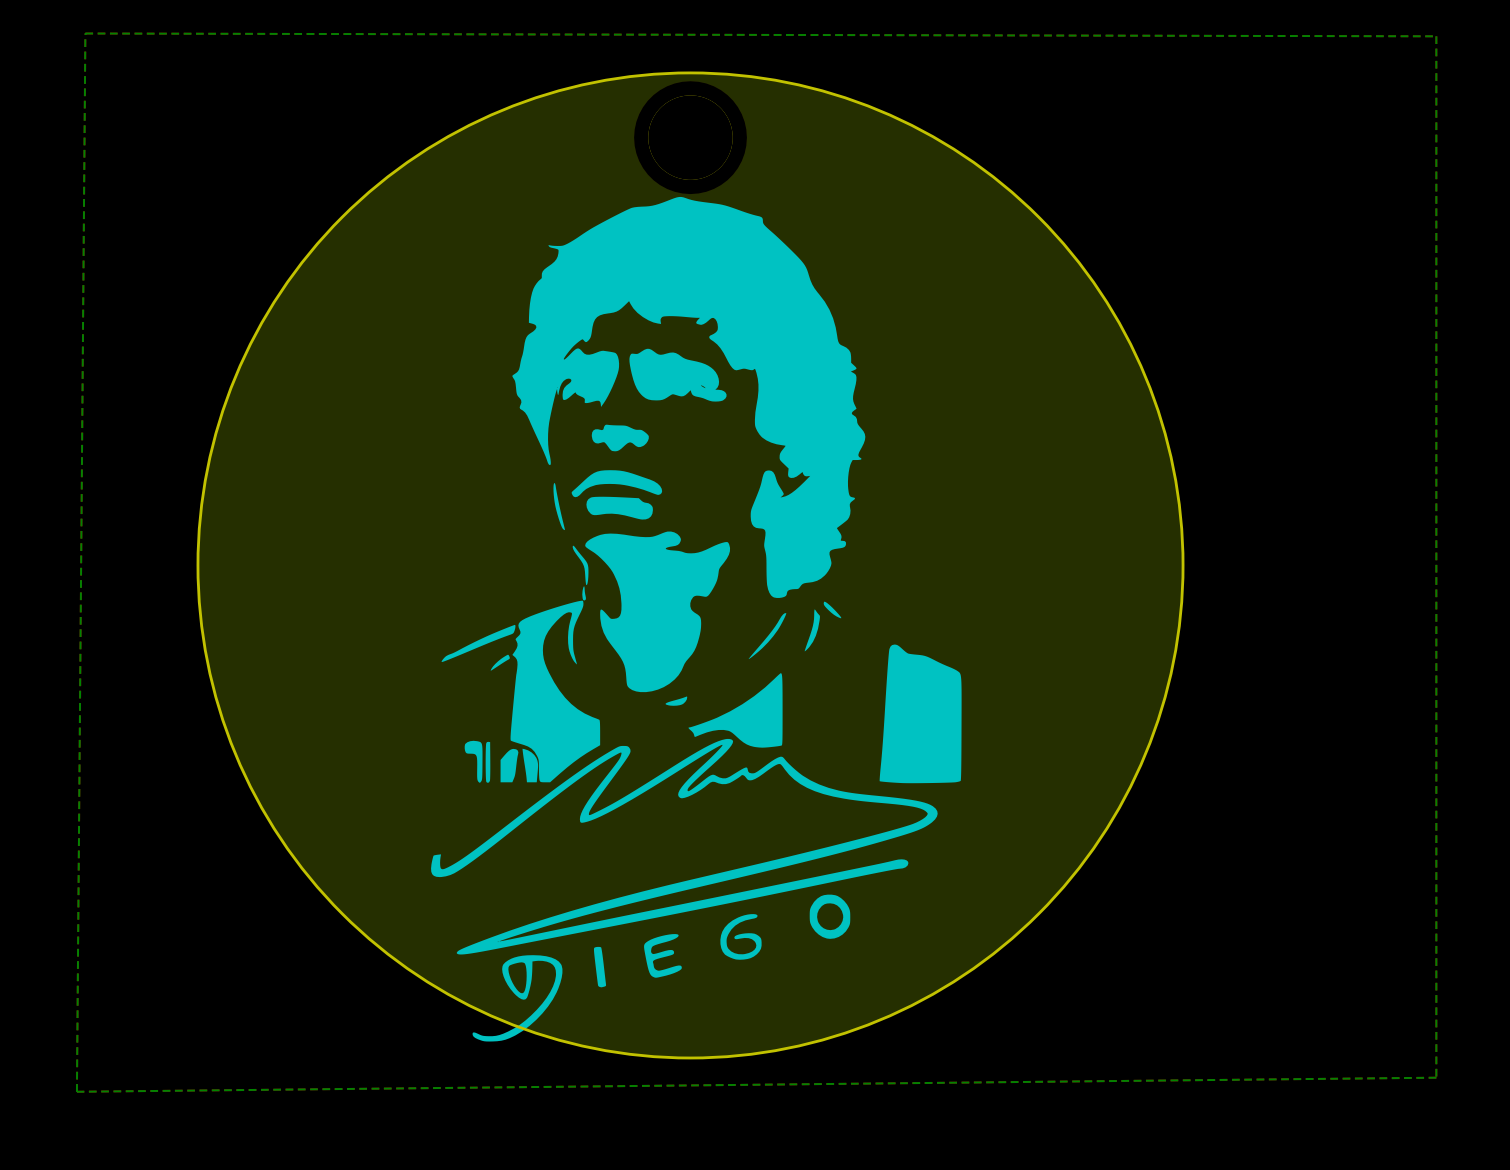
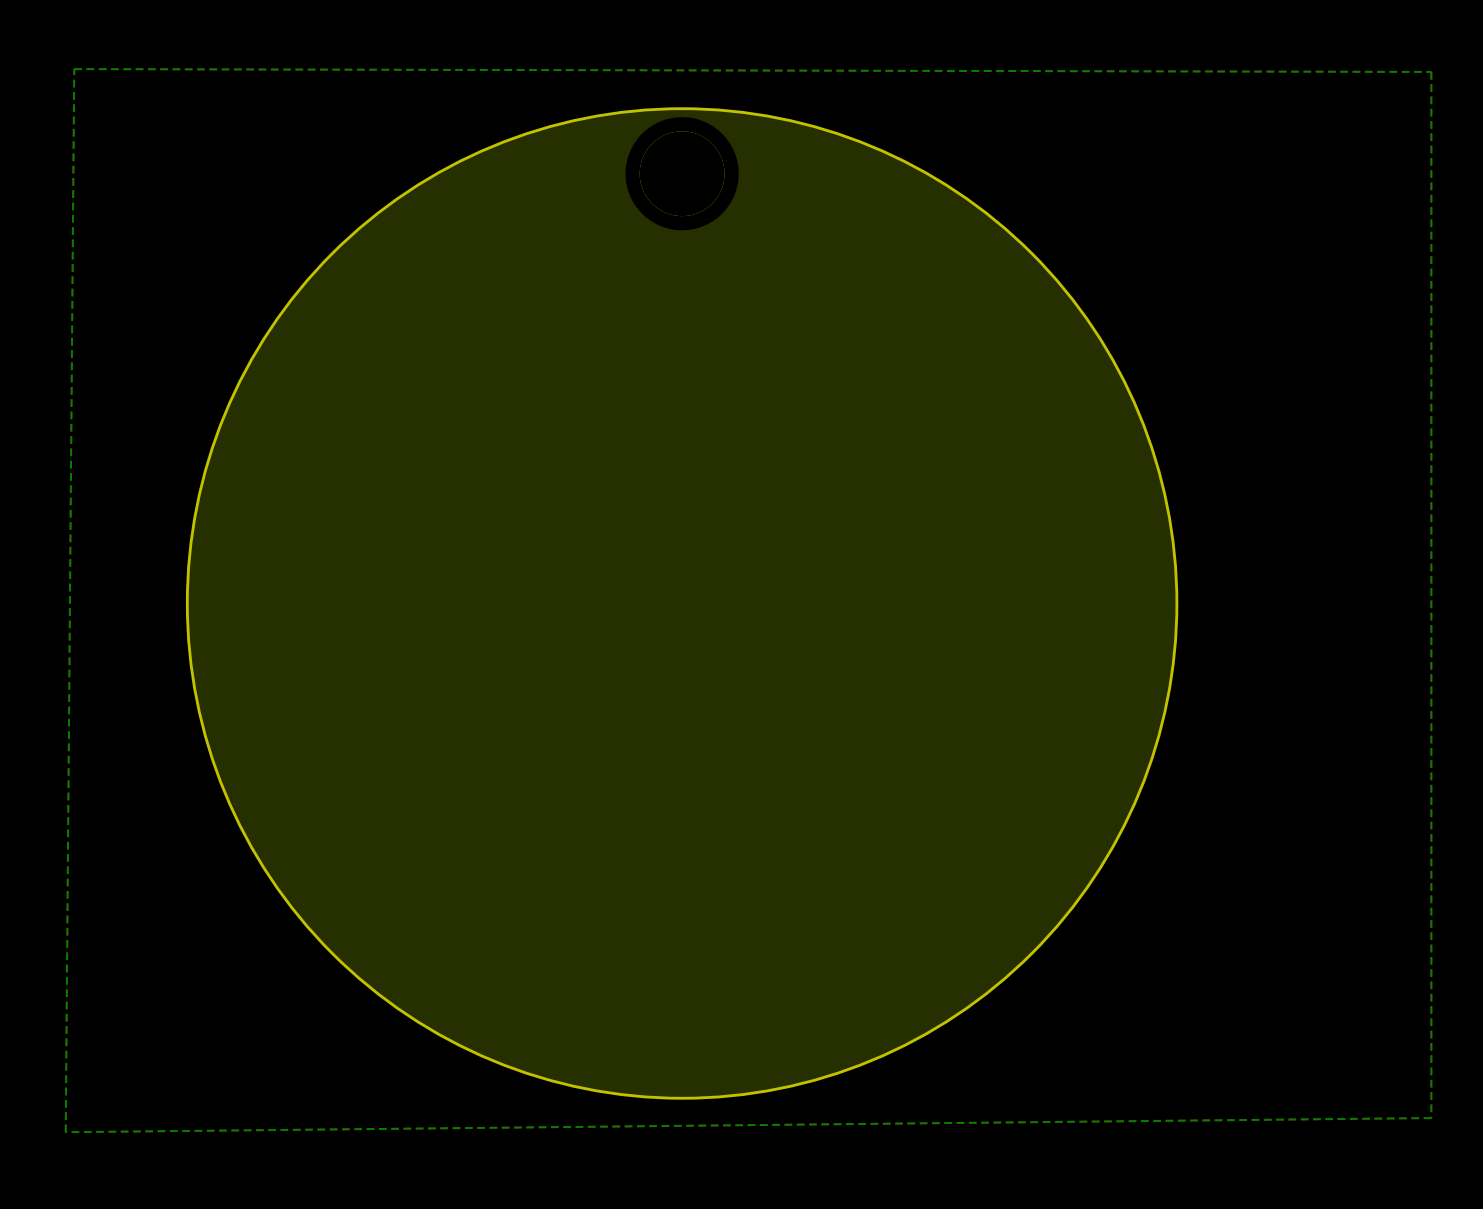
drawing: [431, 196, 962, 1042] -> none

